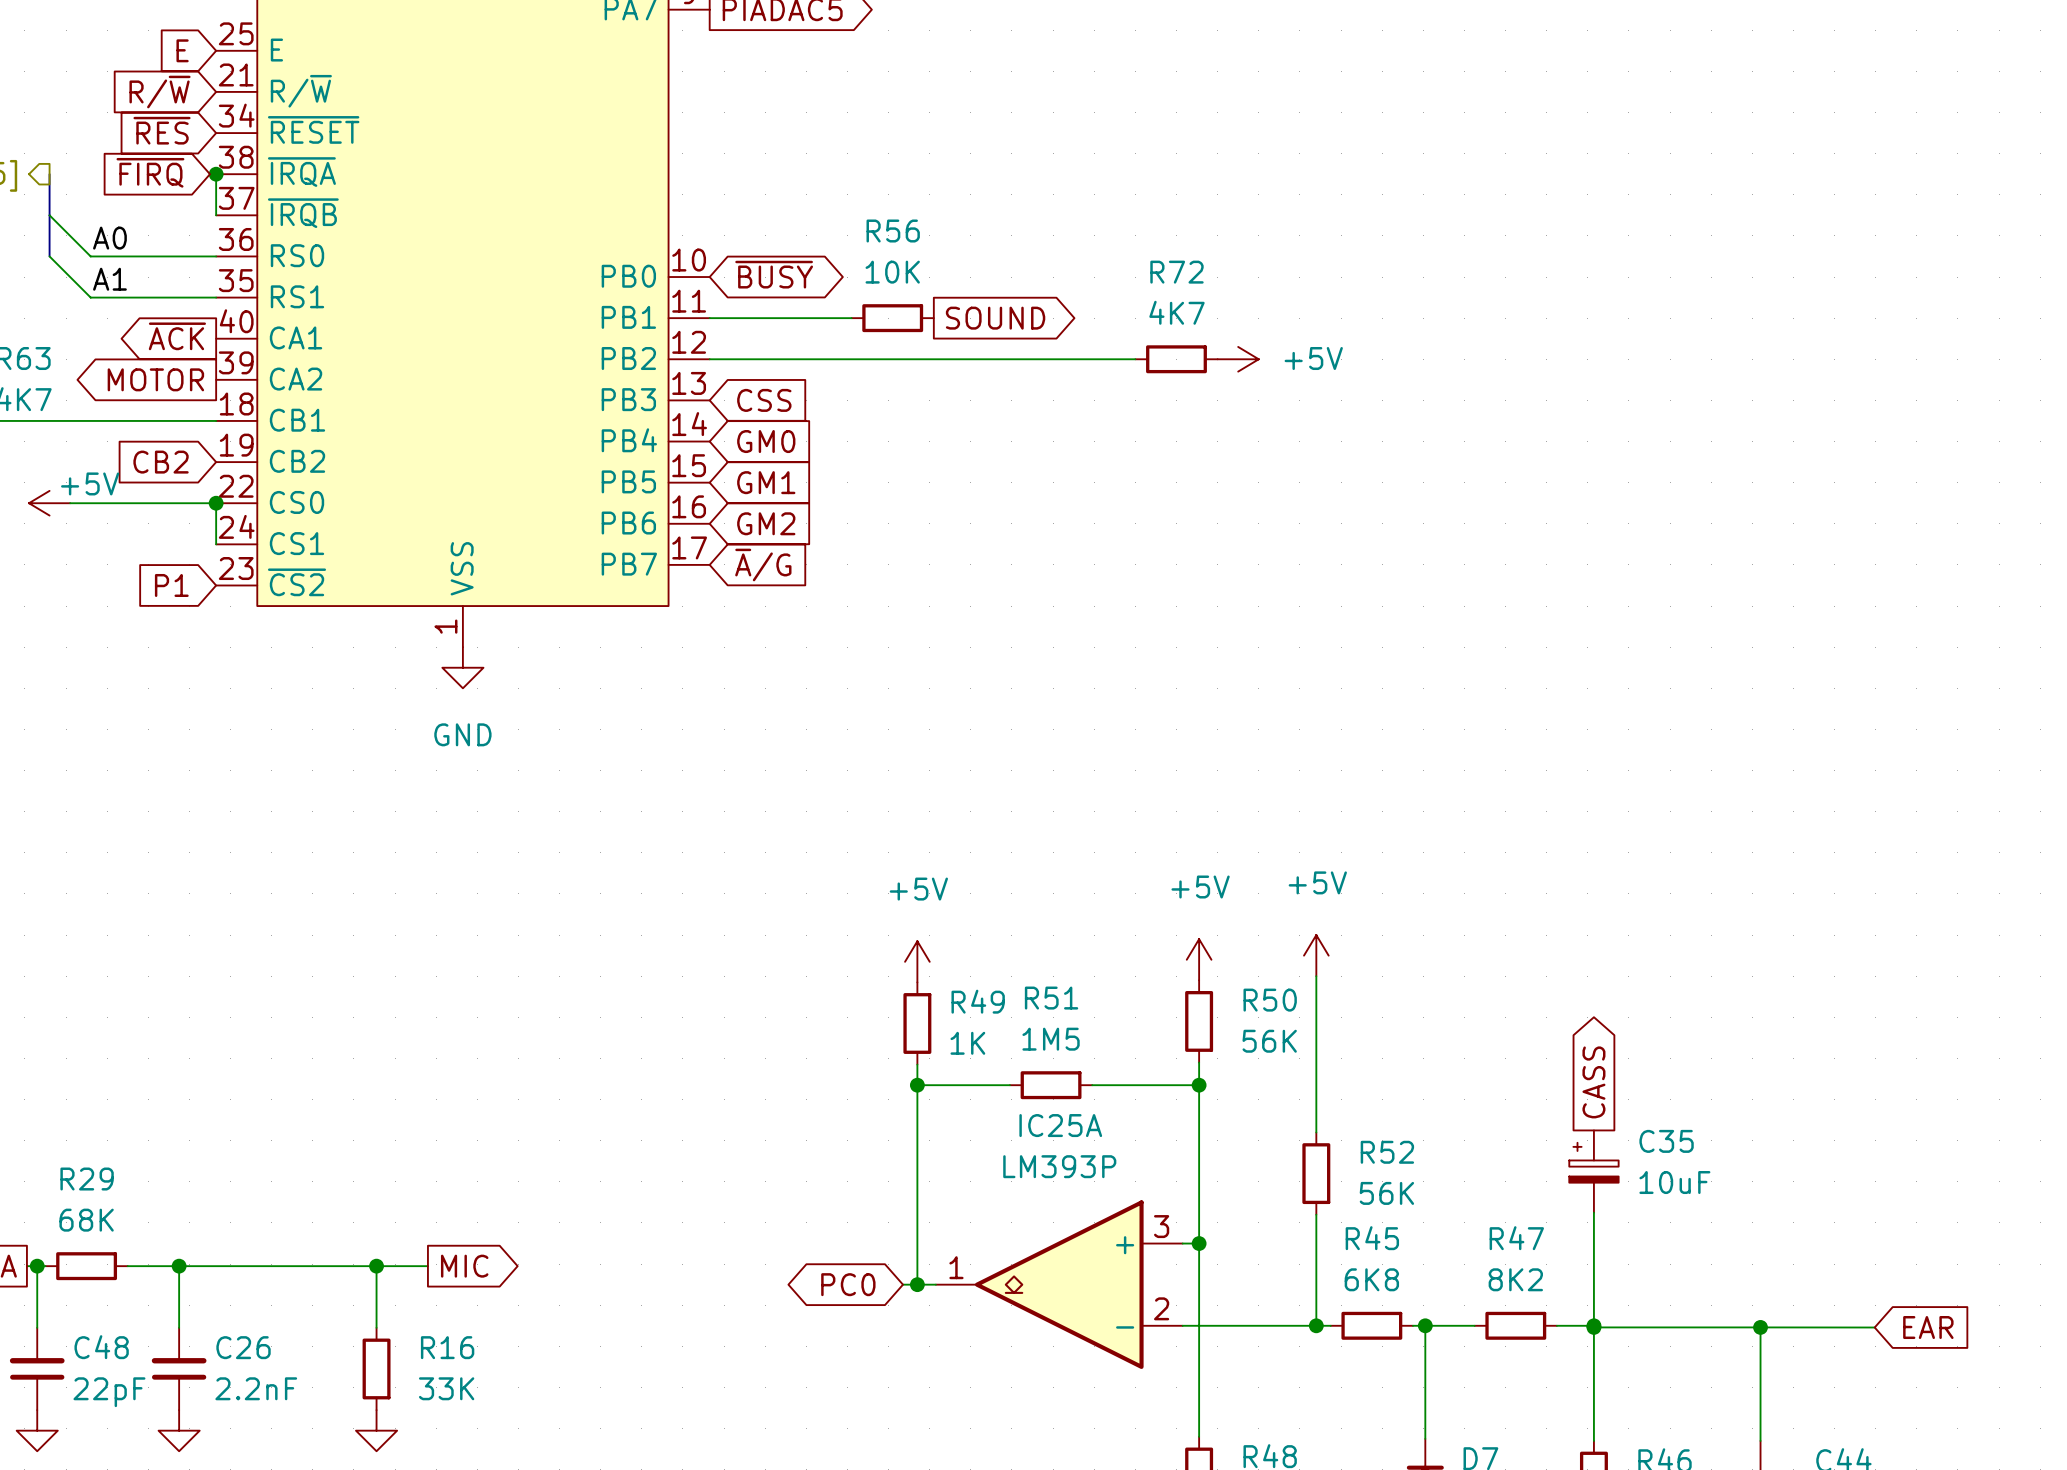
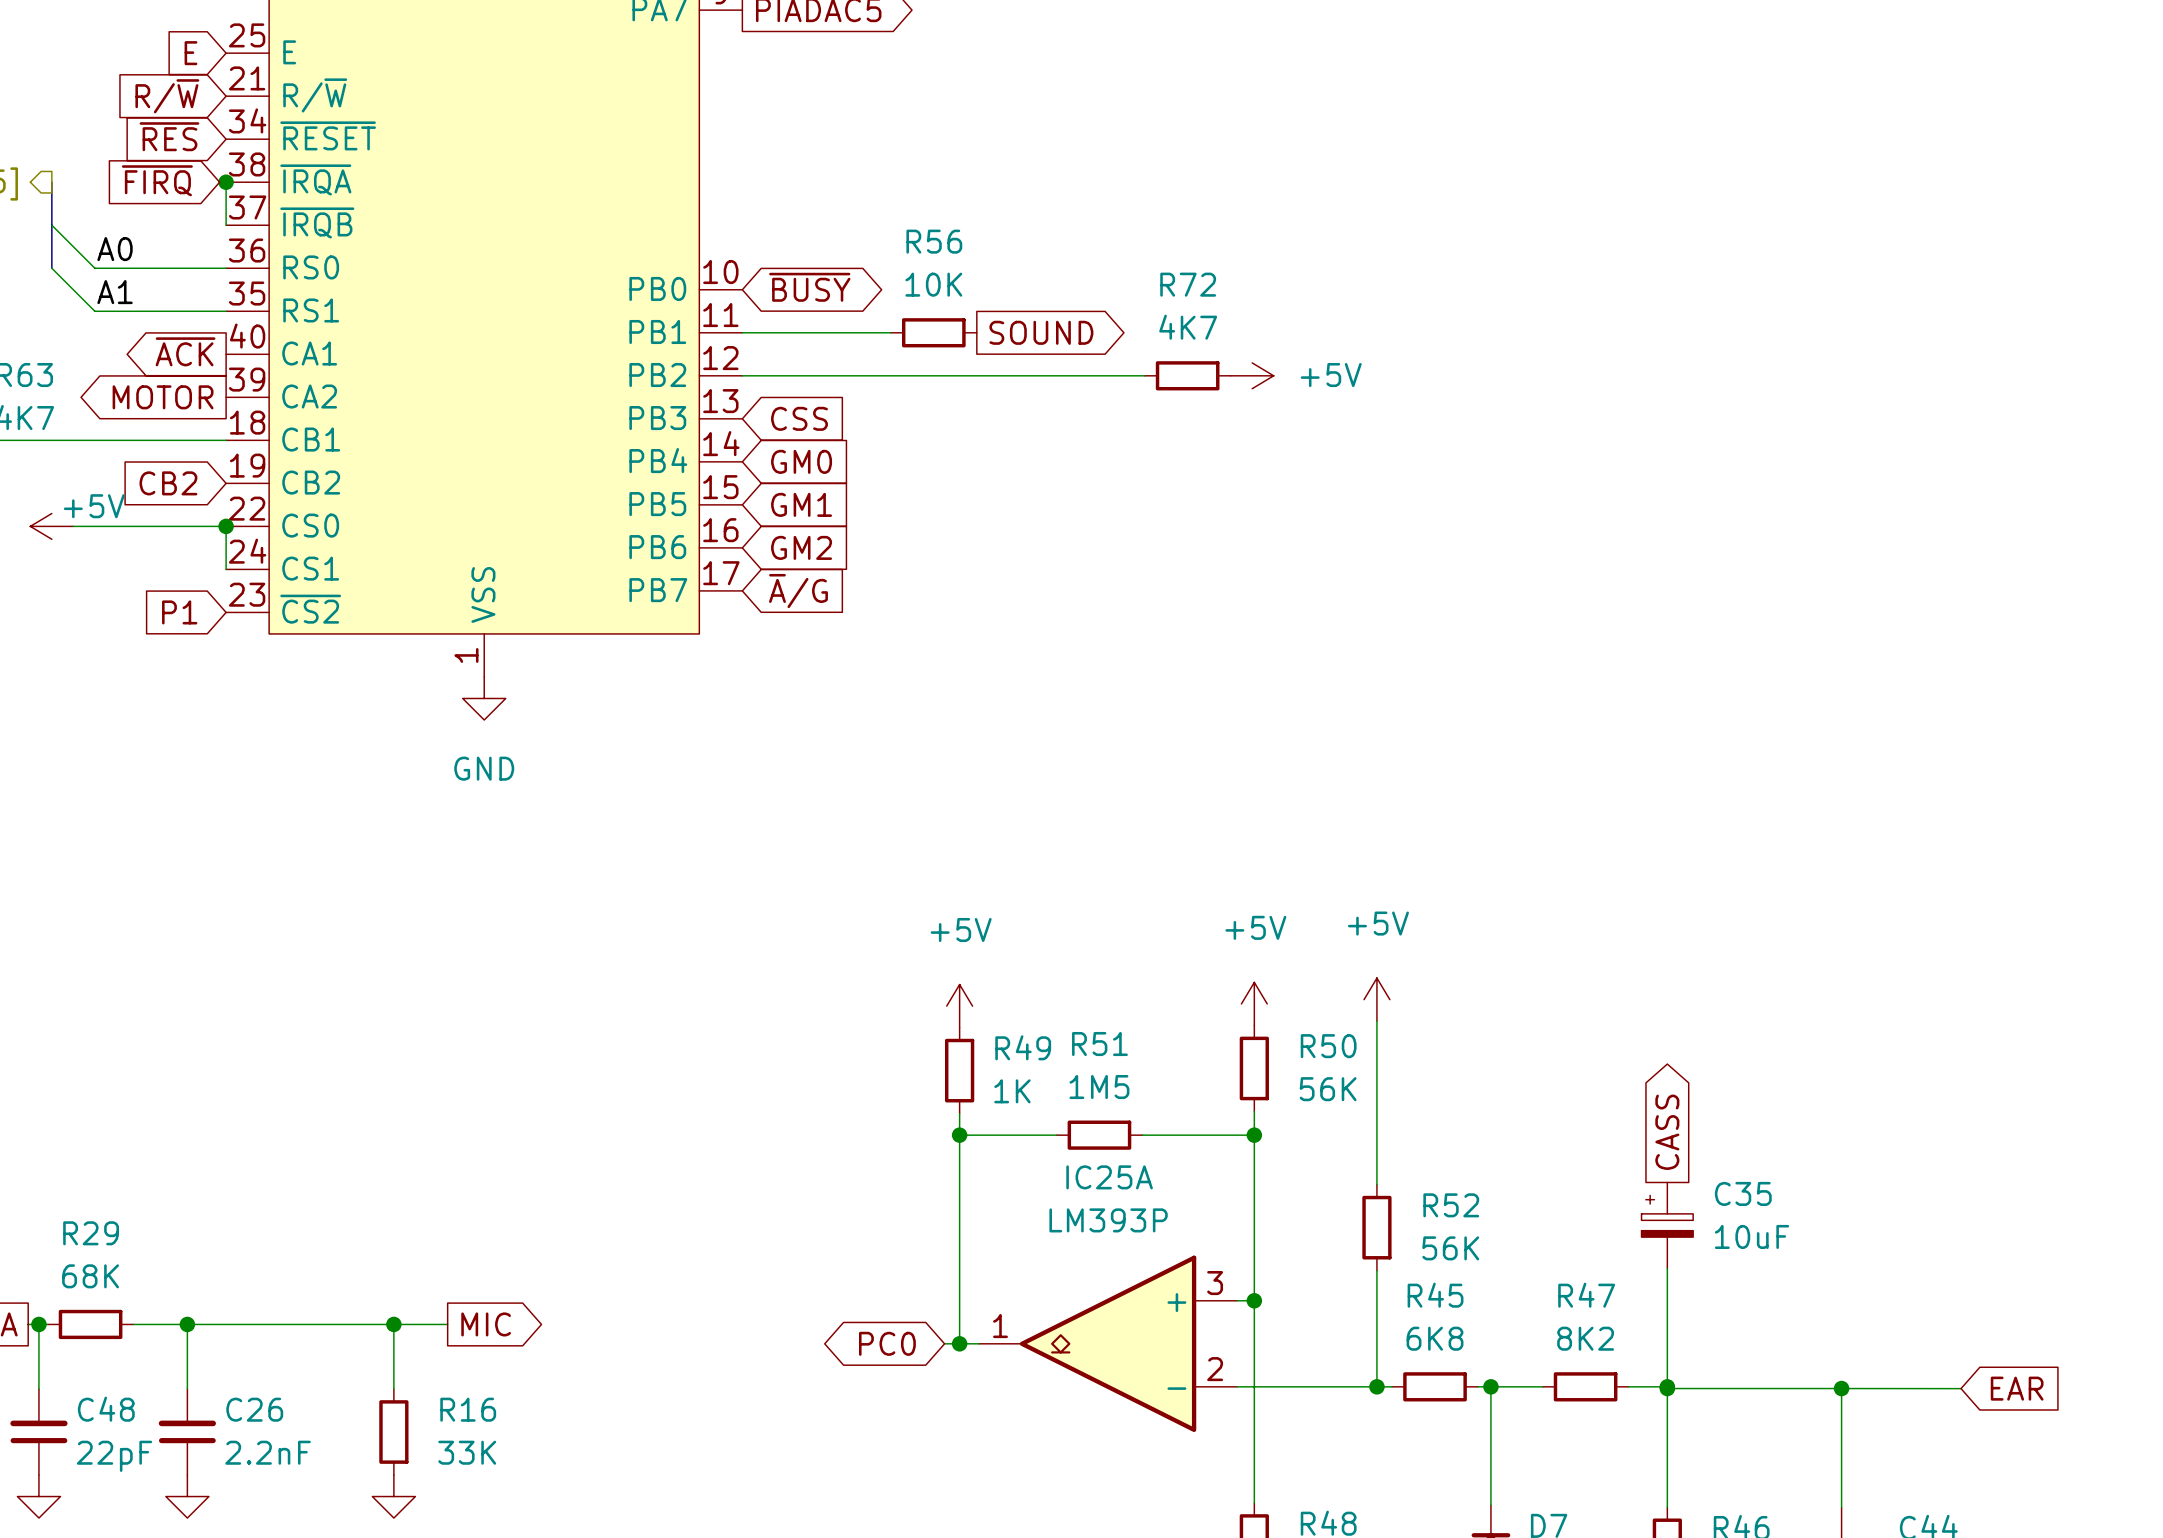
wire: (1094, 359) (1135, 359) -> none
R72 position: (1176, 359) -> (1187, 375)
power symbol position: +5V (1238, 359) -> +5V (1252, 375)

